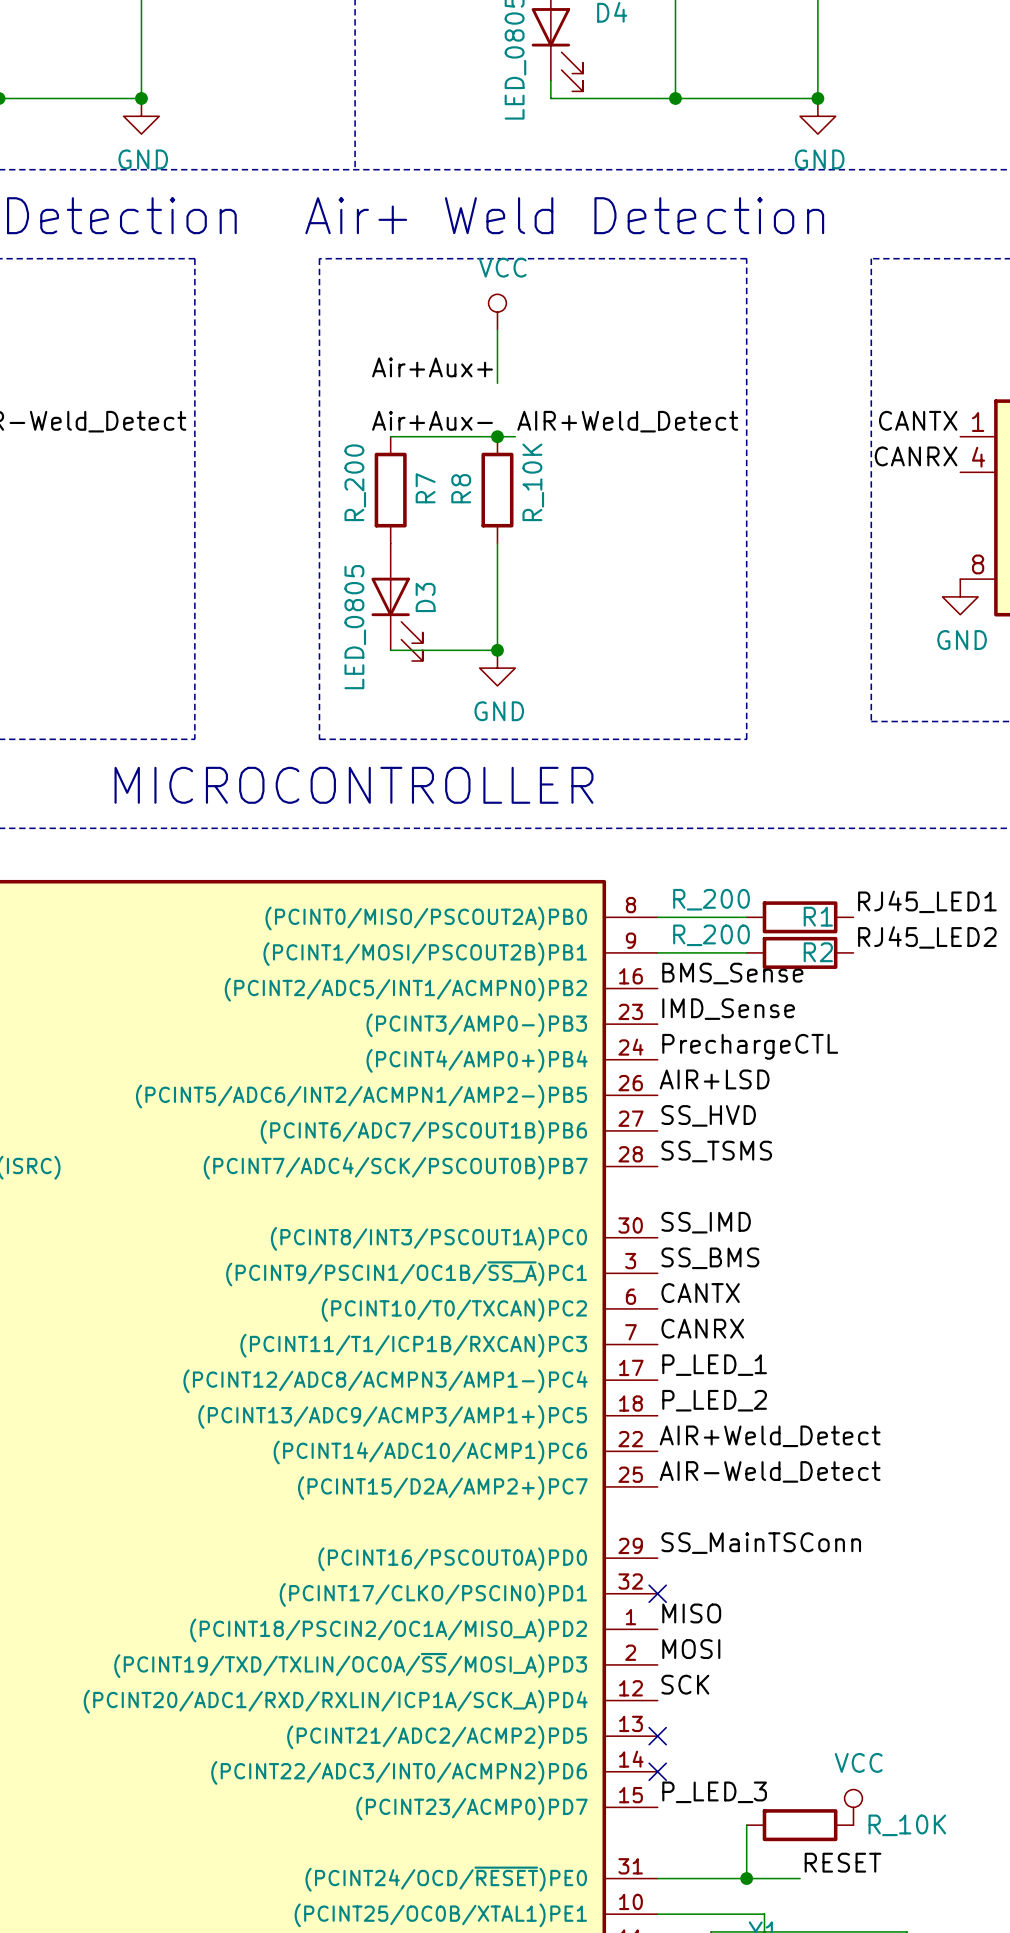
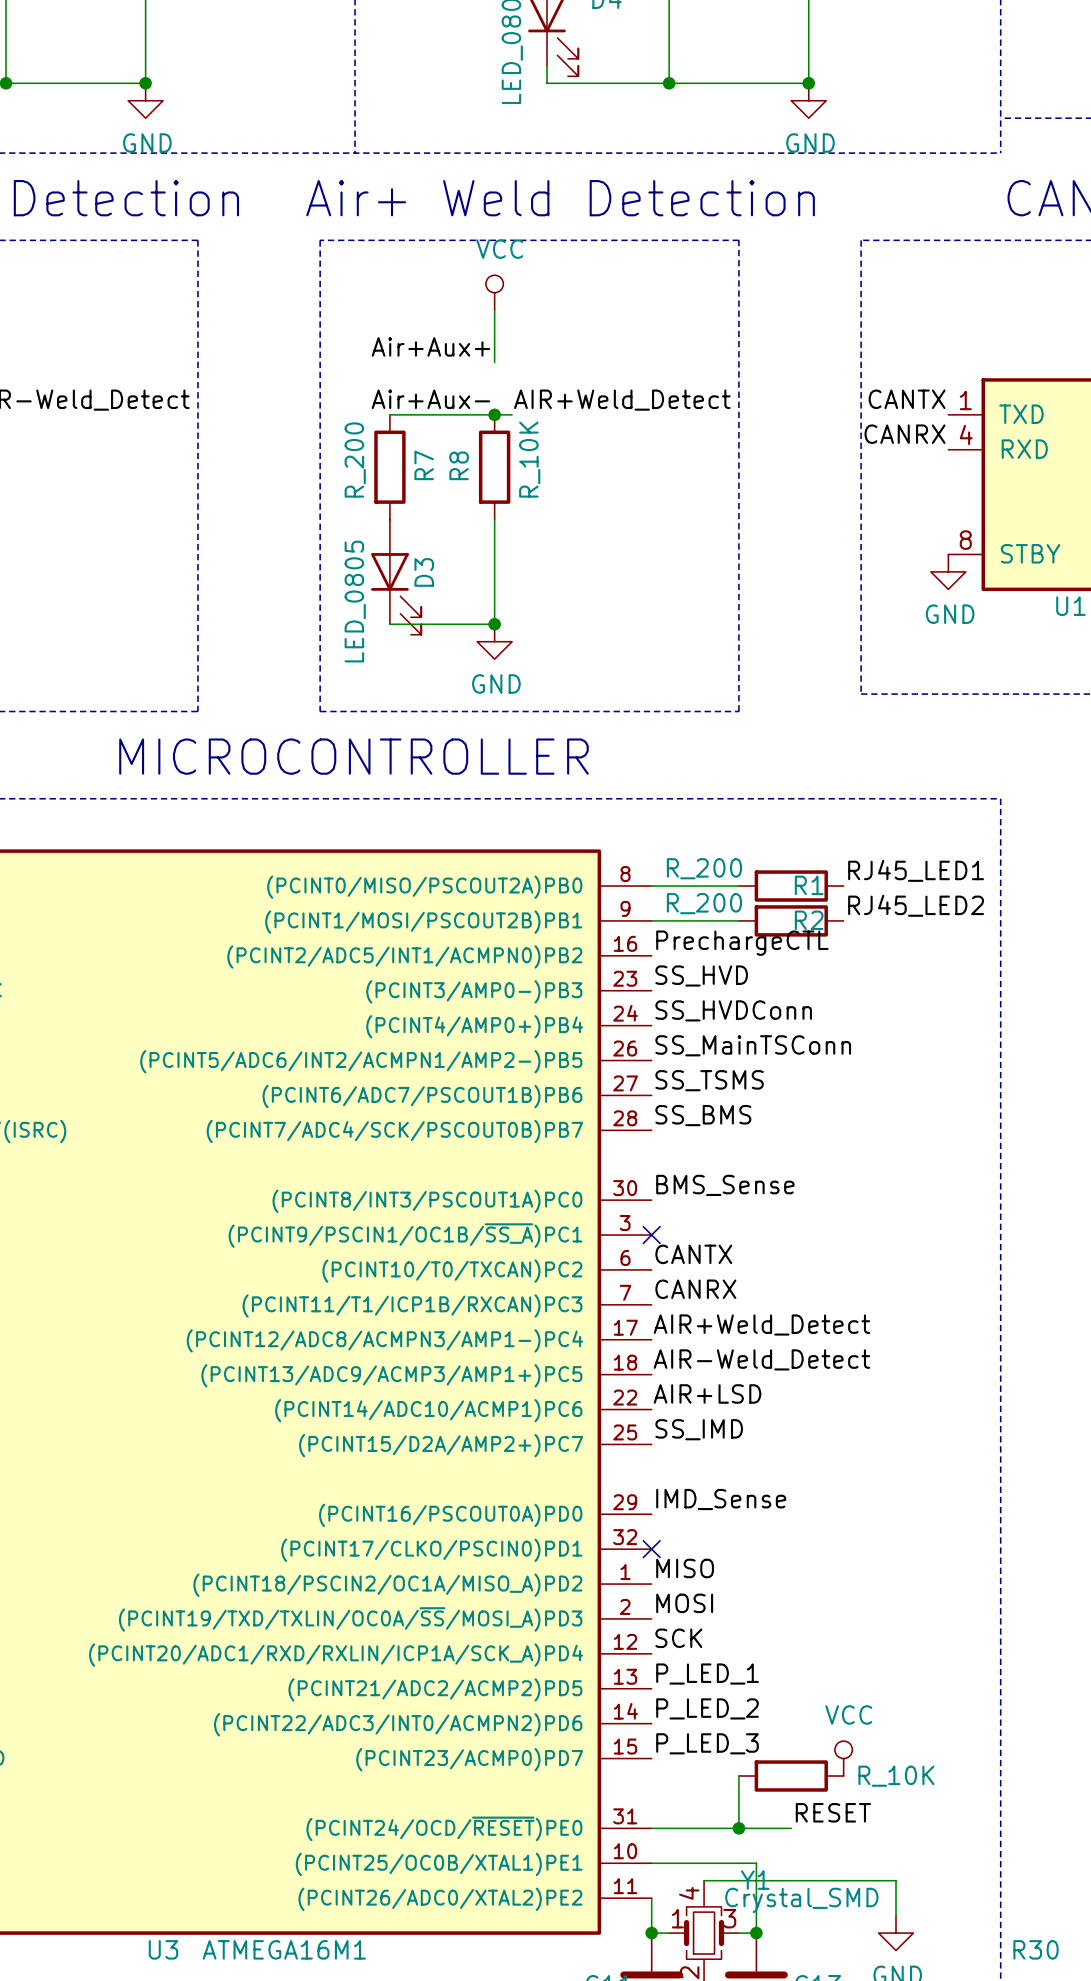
label: BMS_Sense (732, 973) -> PrechargeCTL (742, 943)
label: IMD_Sense (728, 1009) -> SS_HVD (701, 975)
label: PrechargeCTL (750, 1046) -> SS_HVDConn (733, 1010)
label: AIR+LSD (714, 1079) -> SS_MainTSConn (753, 1045)
label: SS_HVD (708, 1115) -> SS_TSMS (709, 1080)
label: SS_TSMS (716, 1151) -> SS_BMS (703, 1115)
label: SS_IMD (706, 1222) -> BMS_Sense (725, 1185)
label: SS_BMS (710, 1258) -> none
no-connect mark: none -> (651, 1235)
label: P_LED_1 (714, 1365) -> AIR+Weld_Detect (761, 1325)
label: P_LED_2 (714, 1400) -> AIR-Weld_Detect (761, 1359)
label: AIR+Weld_Detect (770, 1436) -> AIR+LSD (707, 1393)
label: AIR-Weld_Detect (770, 1471) -> SS_IMD (699, 1429)
label: SS_MainTSConn (761, 1543) -> IMD_Sense (721, 1499)
label: none -> P_LED_1 (707, 1674)
no-connect mark: (657, 1736) -> none
label: none -> P_LED_2 (707, 1708)
no-connect mark: (657, 1771) -> none

